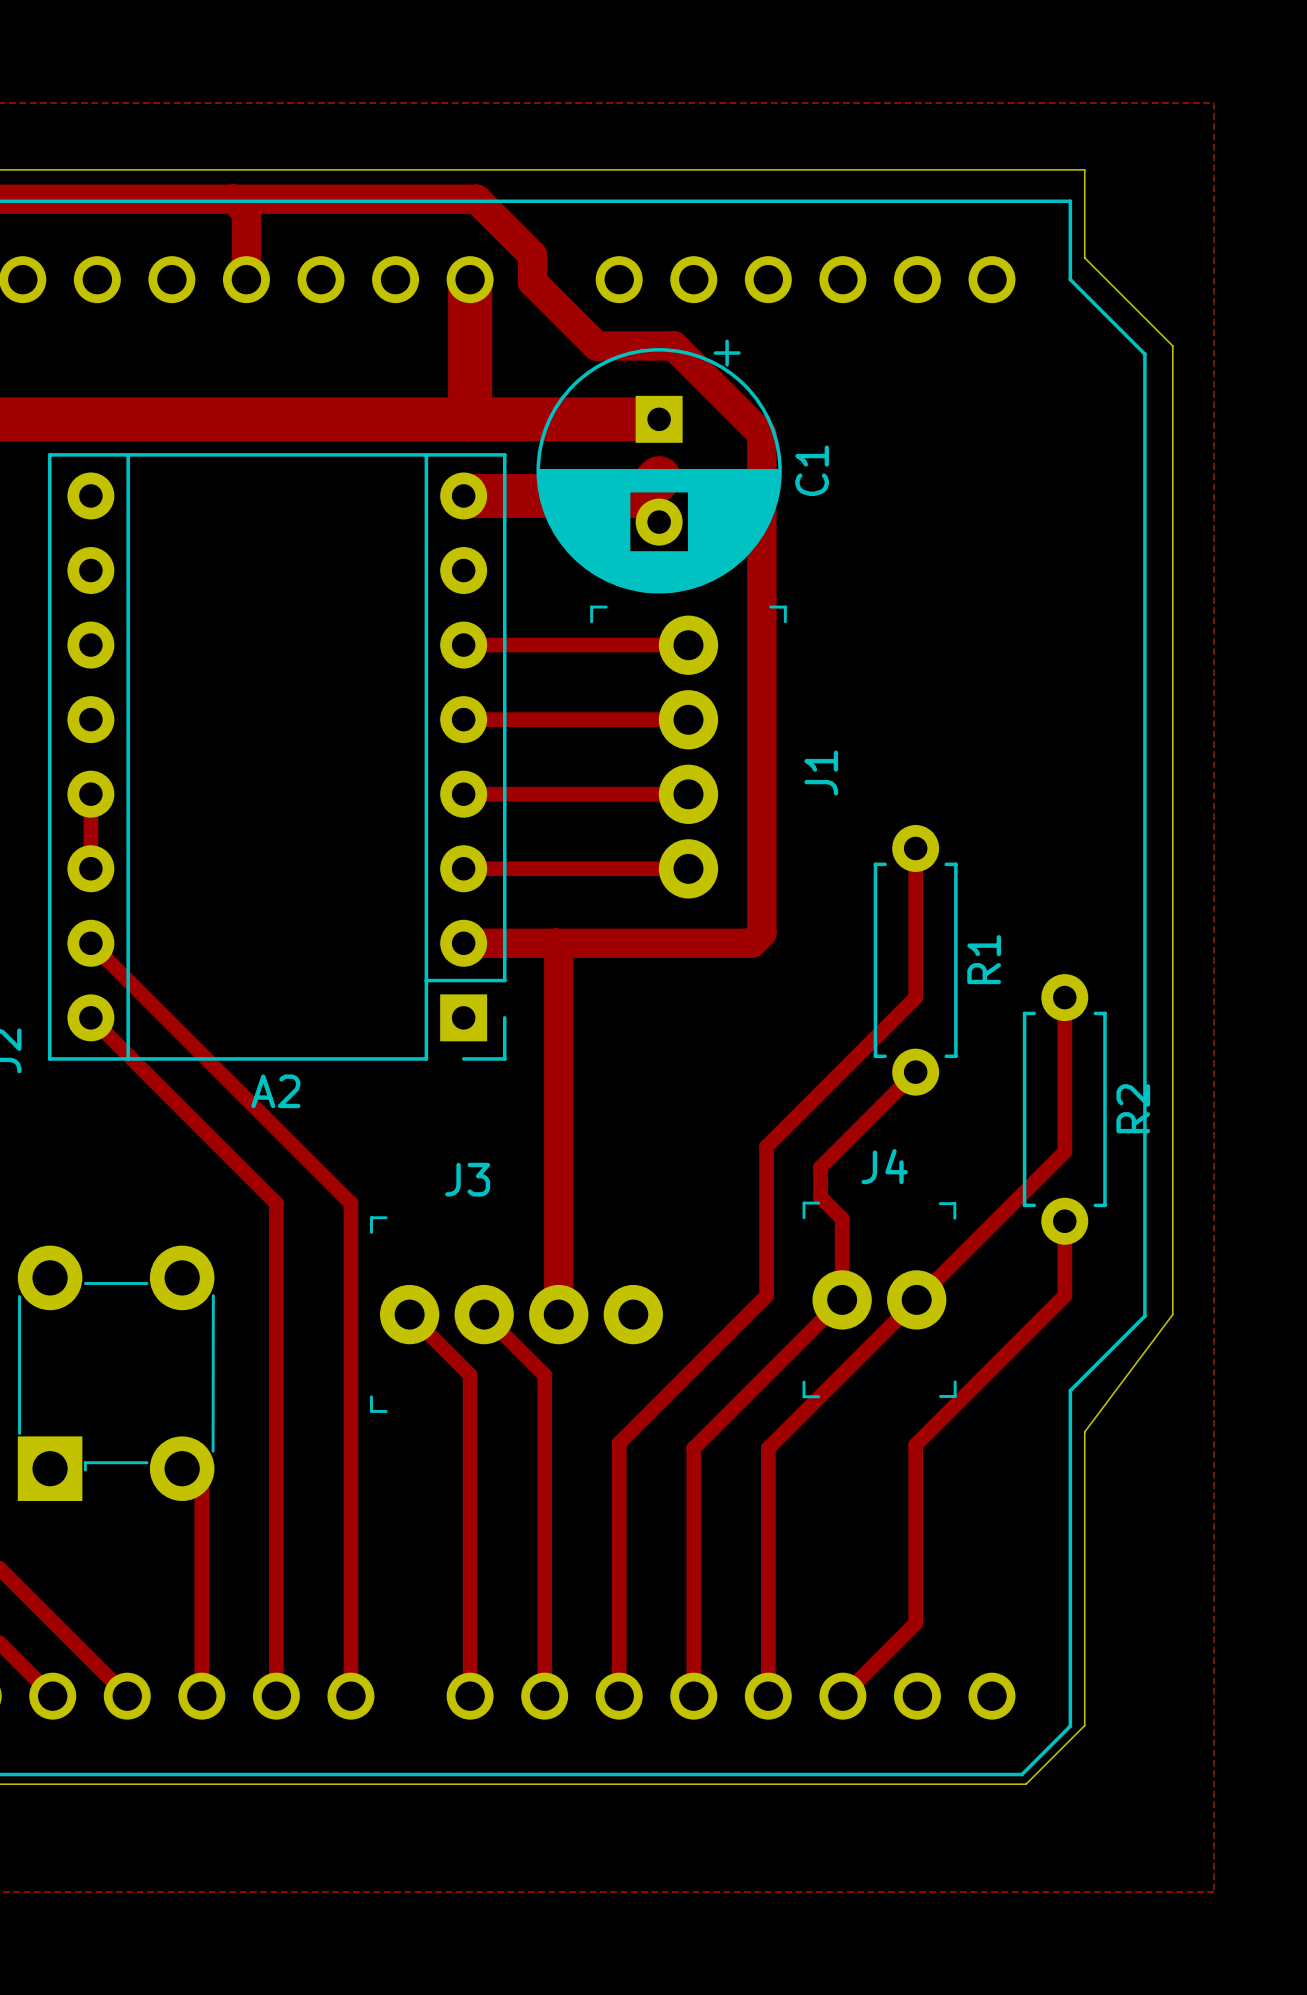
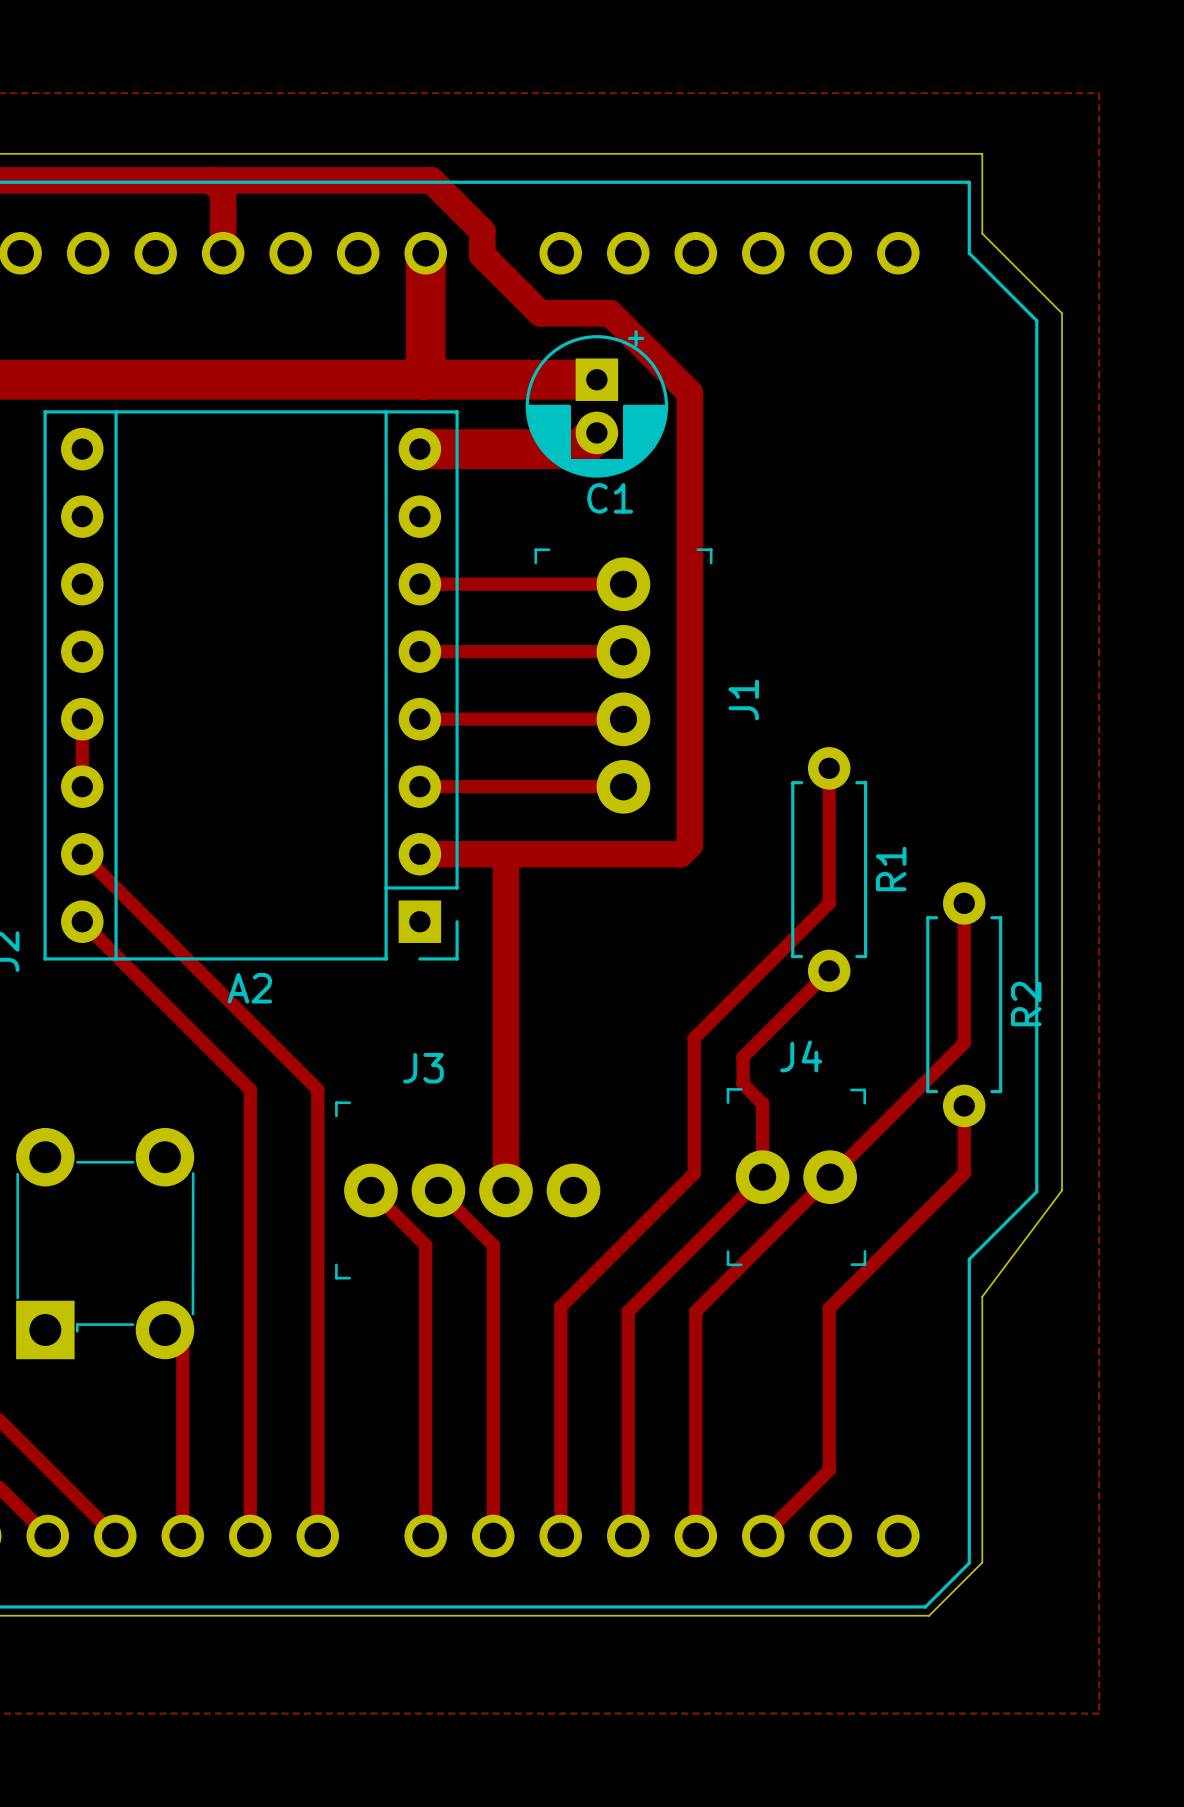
C1 footprint: [536, 339, 782, 594] -> [525, 330, 669, 478]
C1 name position: C1 (812, 470) -> C1 (610, 498)

